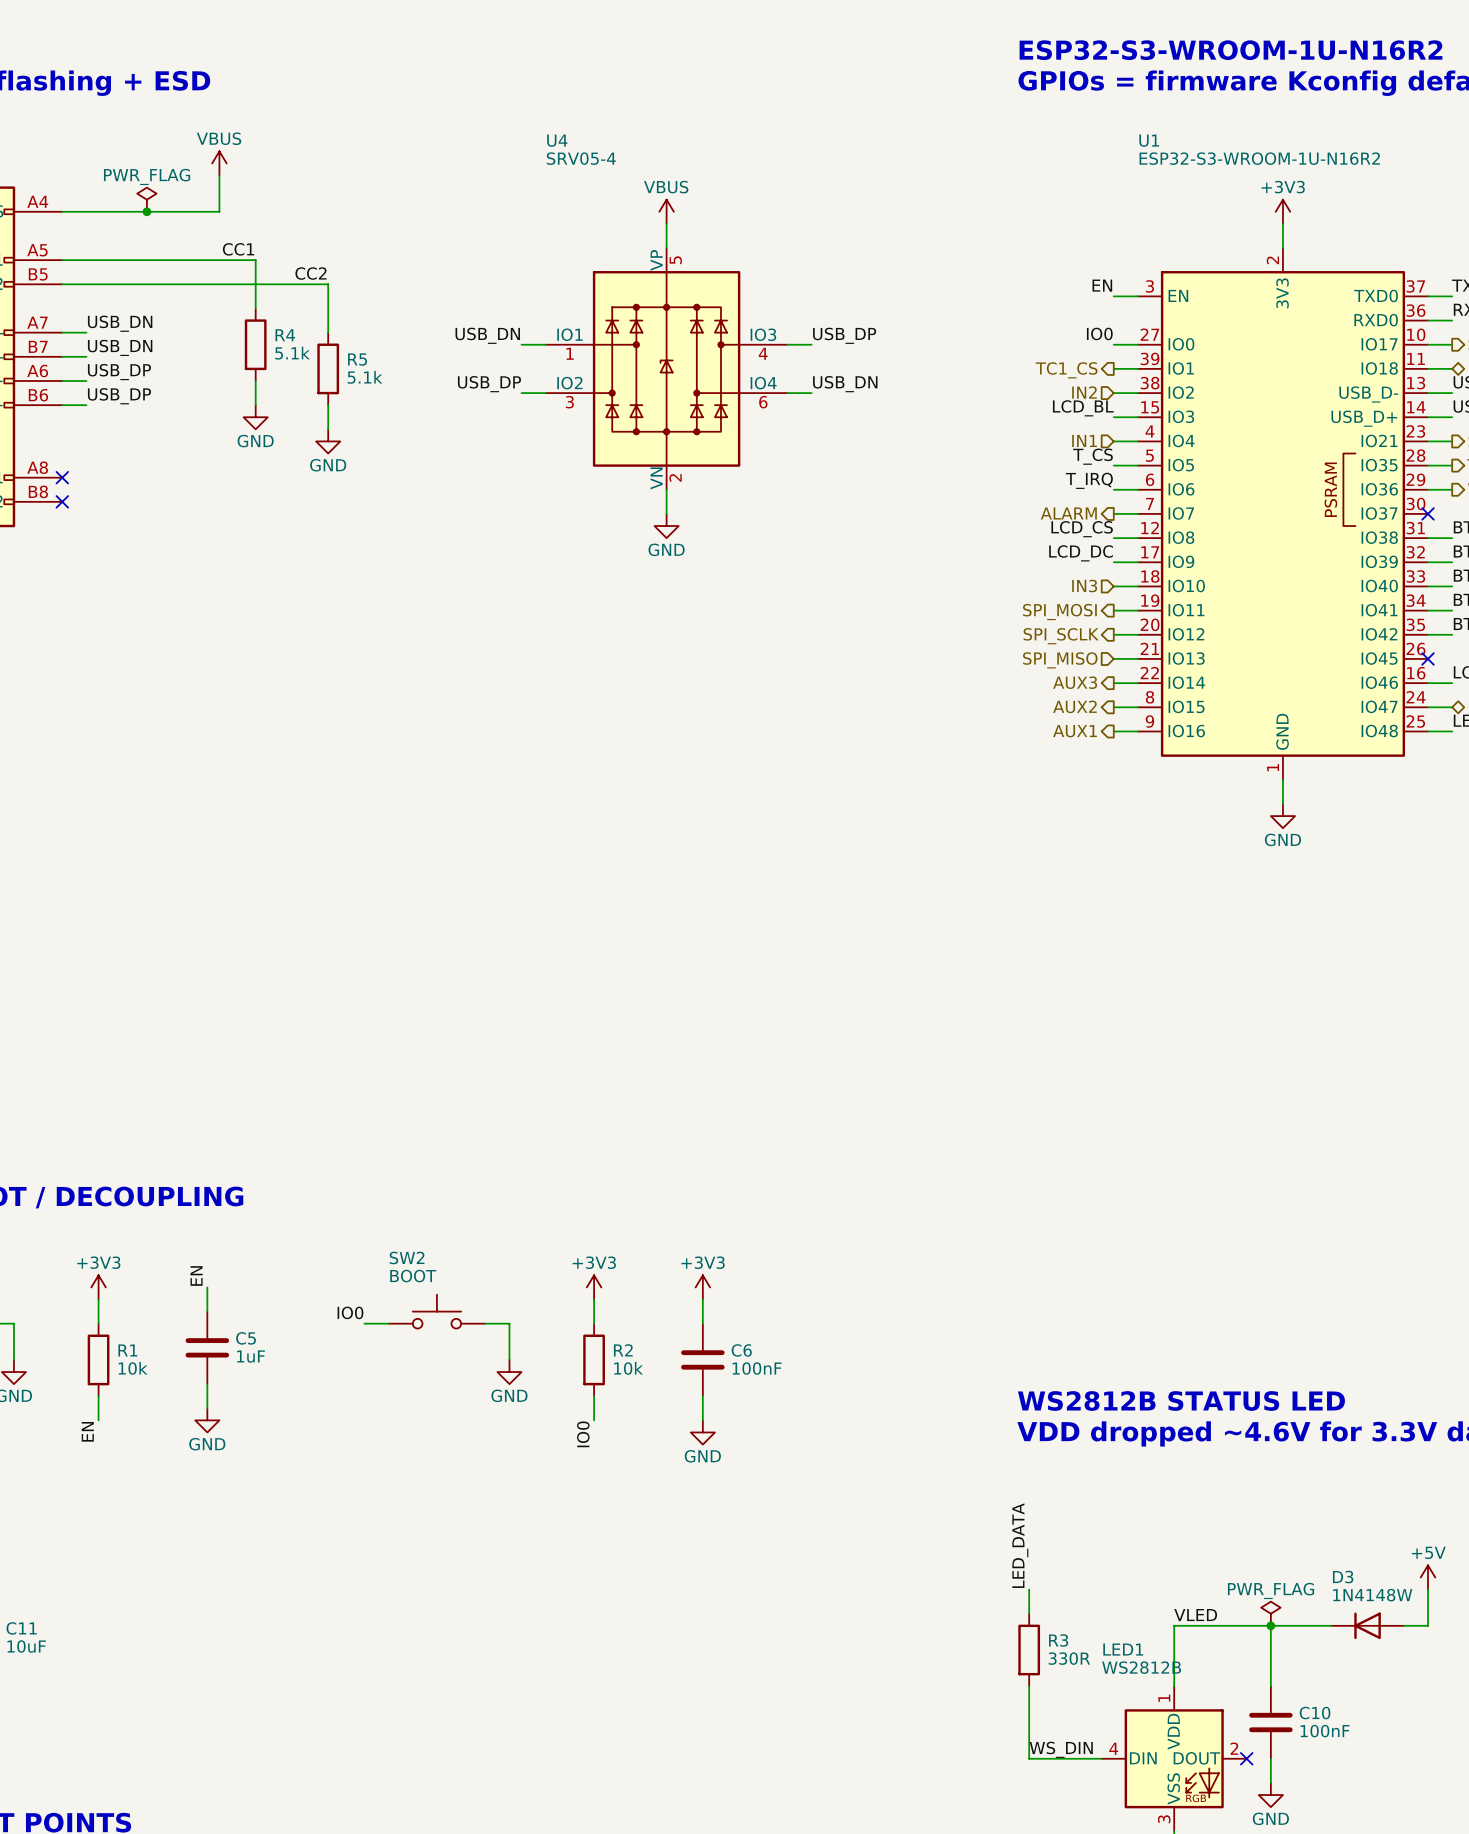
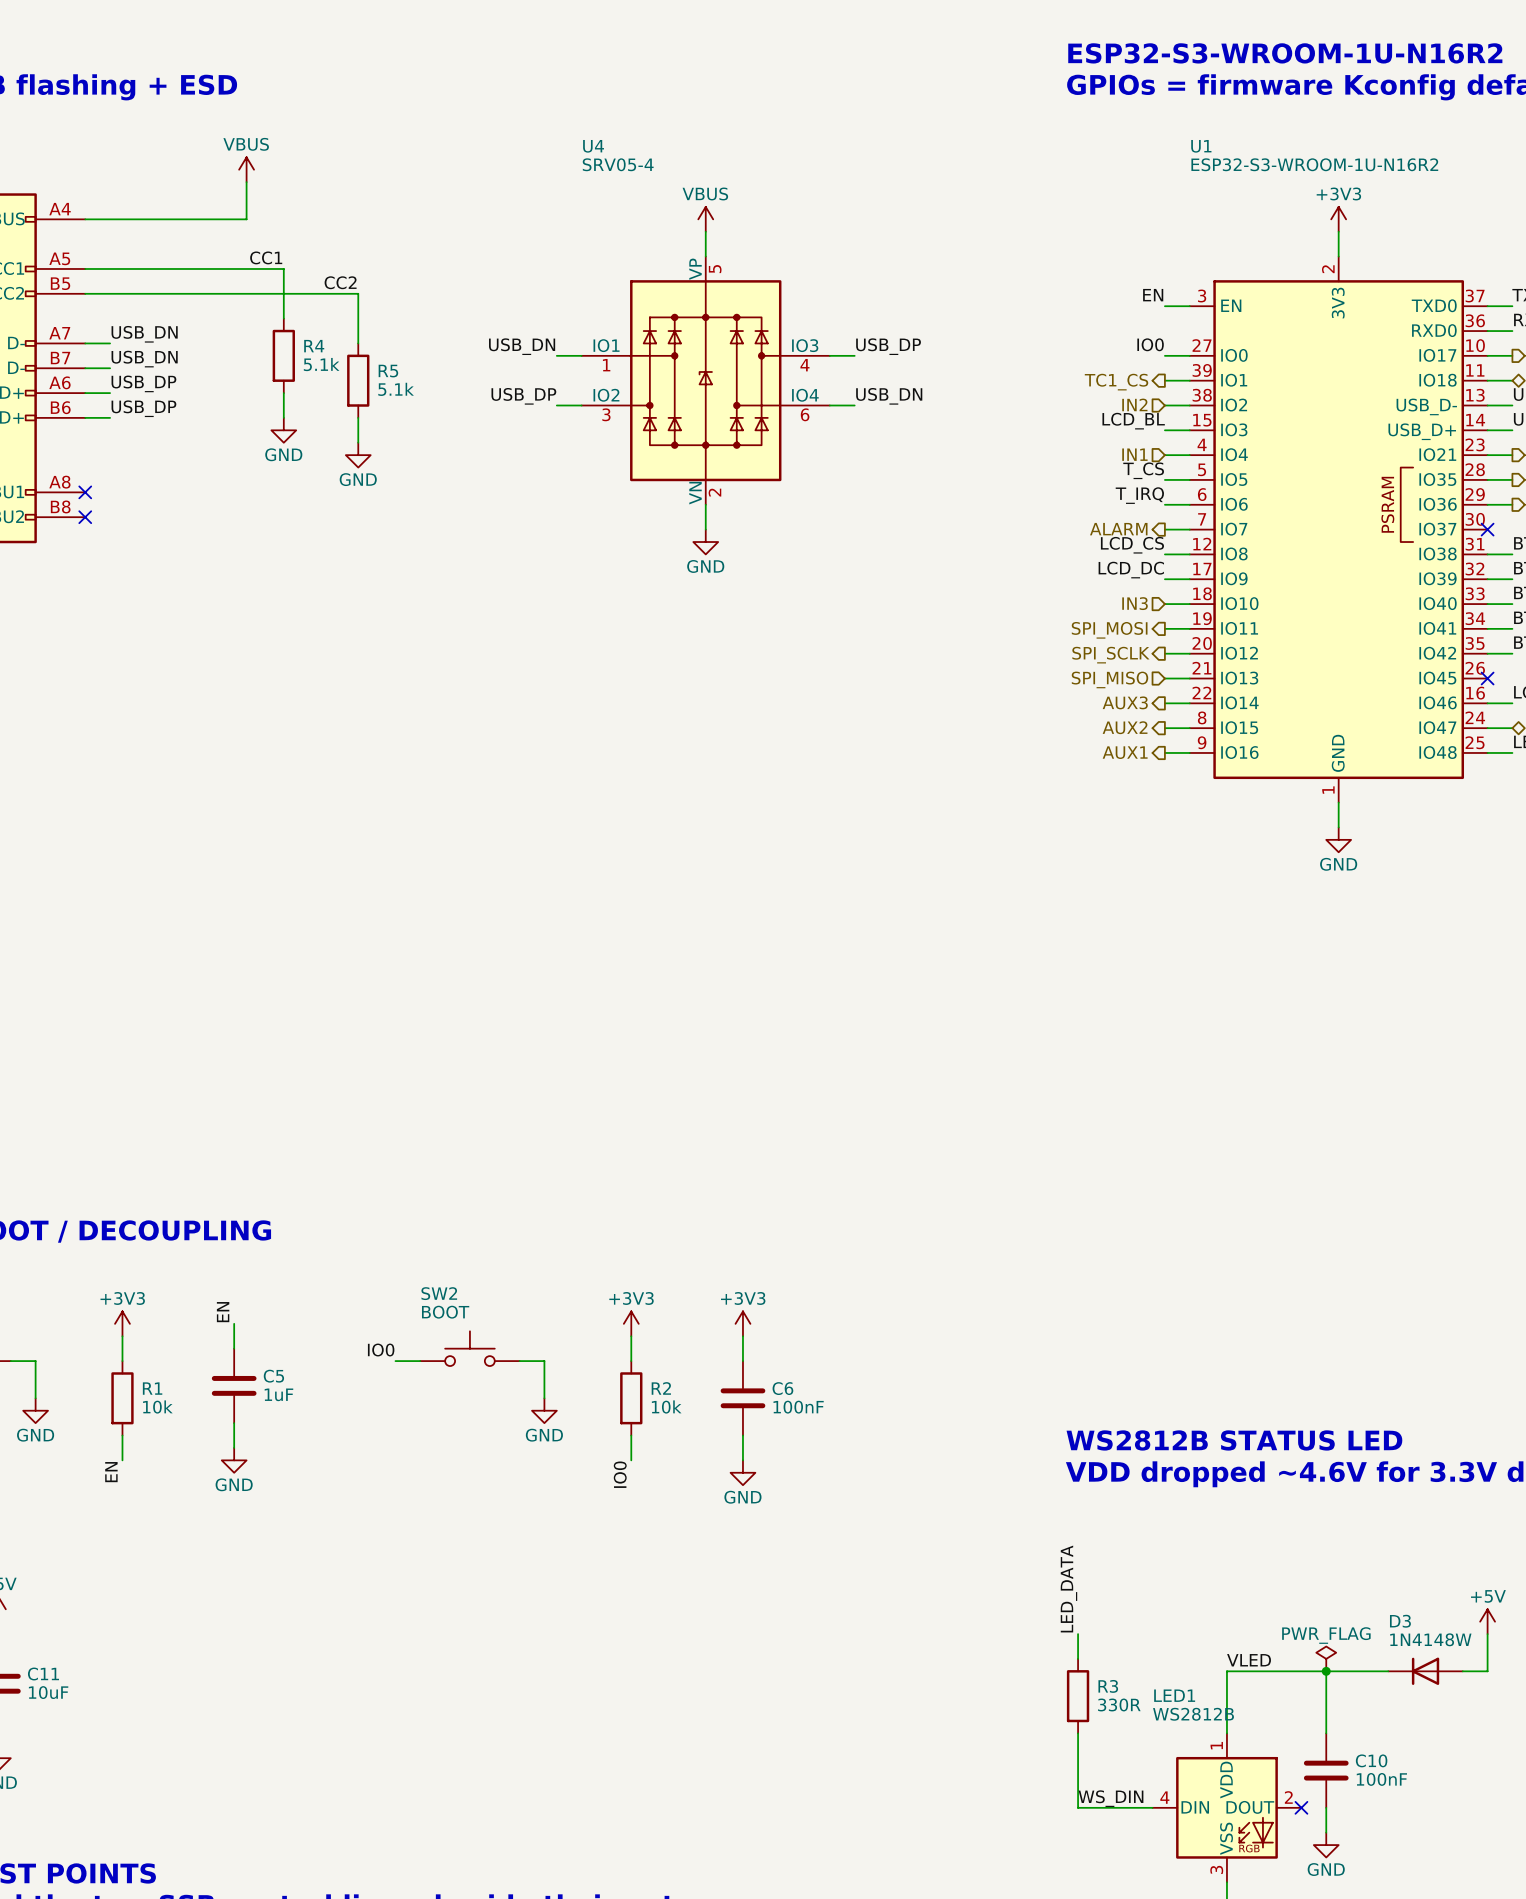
power symbol: PWR_FLAG (146, 199) -> none
junction: (146, 211) -> none

